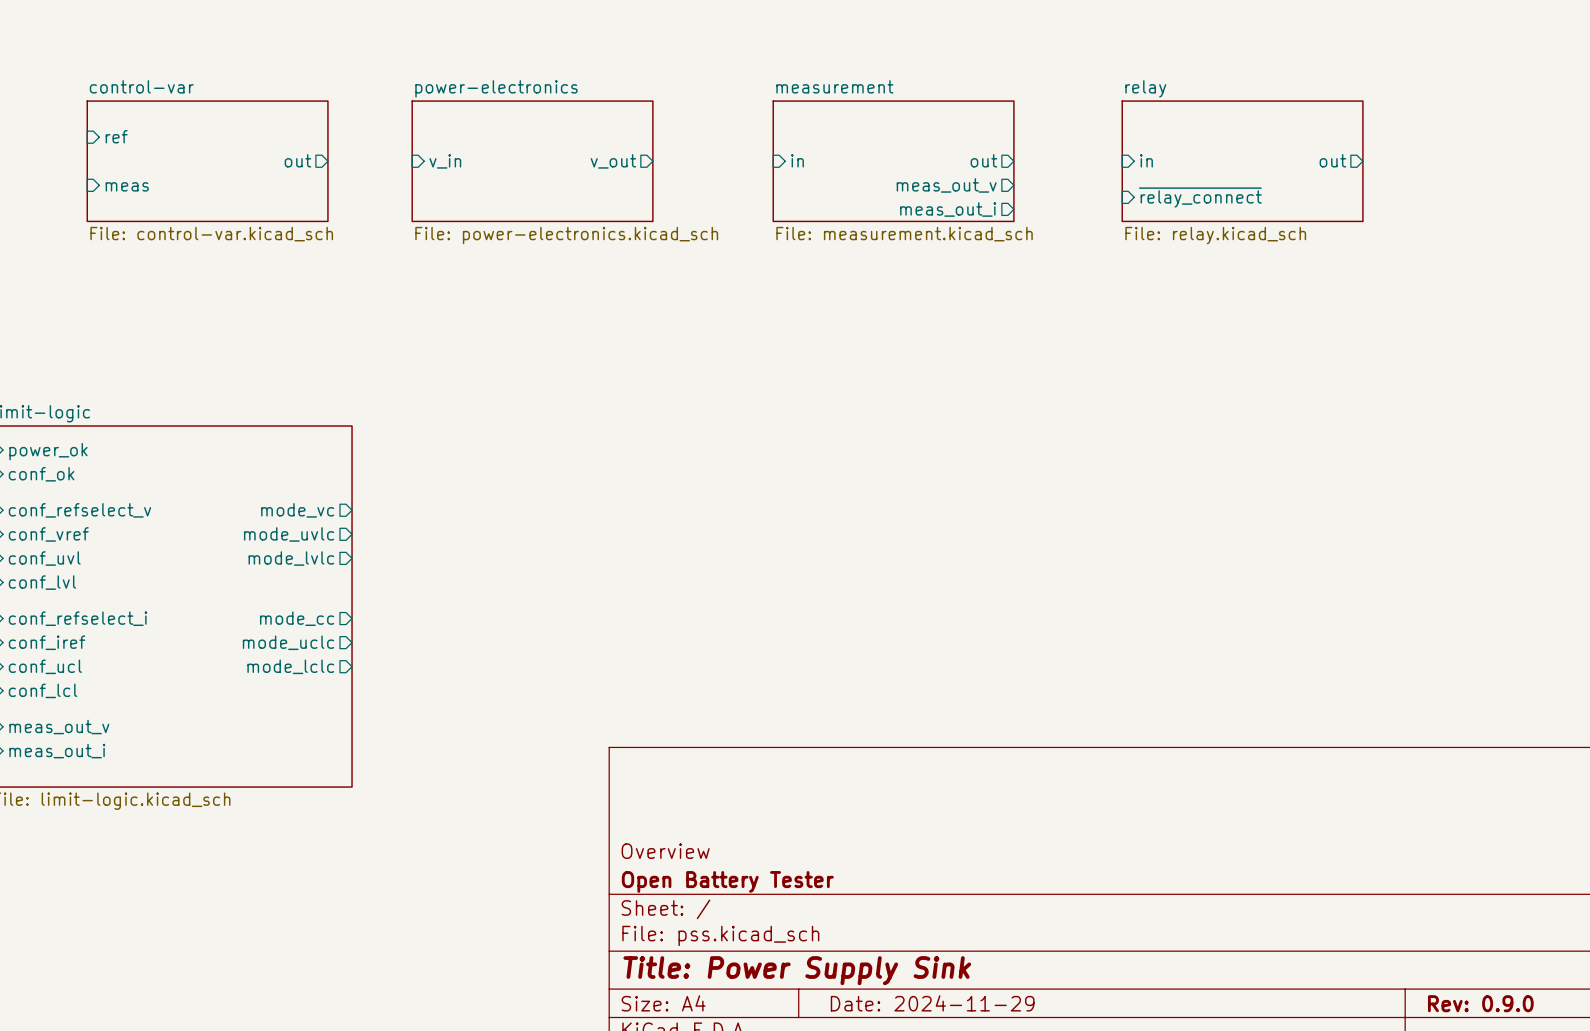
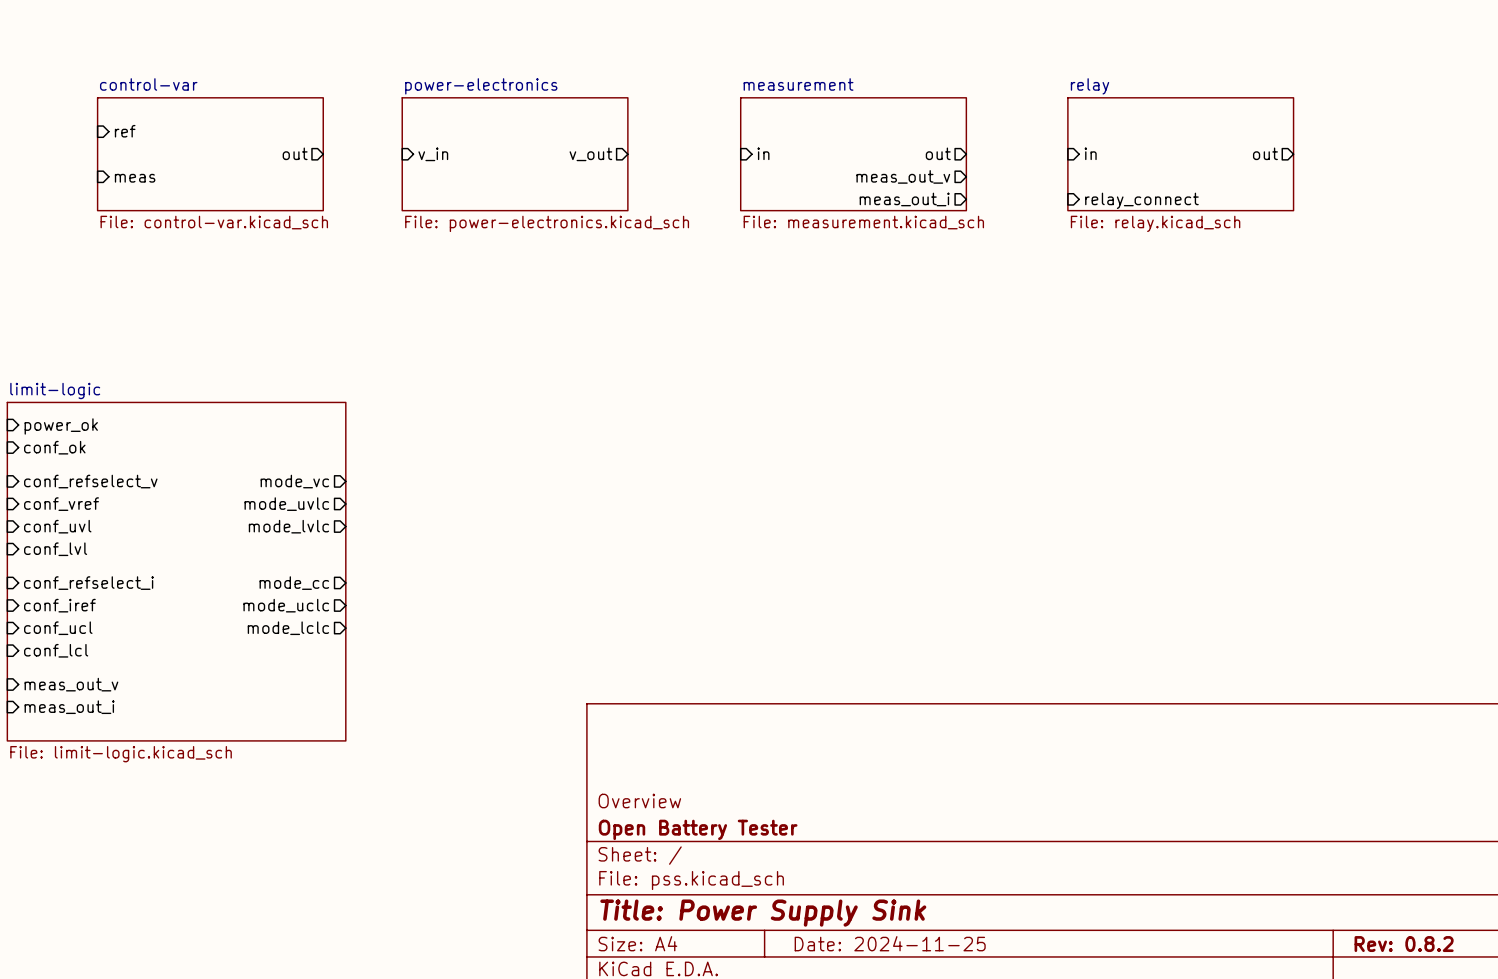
sheet pin: ~{relay_connect} (1200, 197) -> relay_connect (1141, 200)
title block: Date: 2024-11-29 (932, 1003) -> Date: 2024-11-25 (890, 943)
title block: Rev: 0.9.0 (1480, 1003) -> Rev: 0.8.2 (1404, 944)

